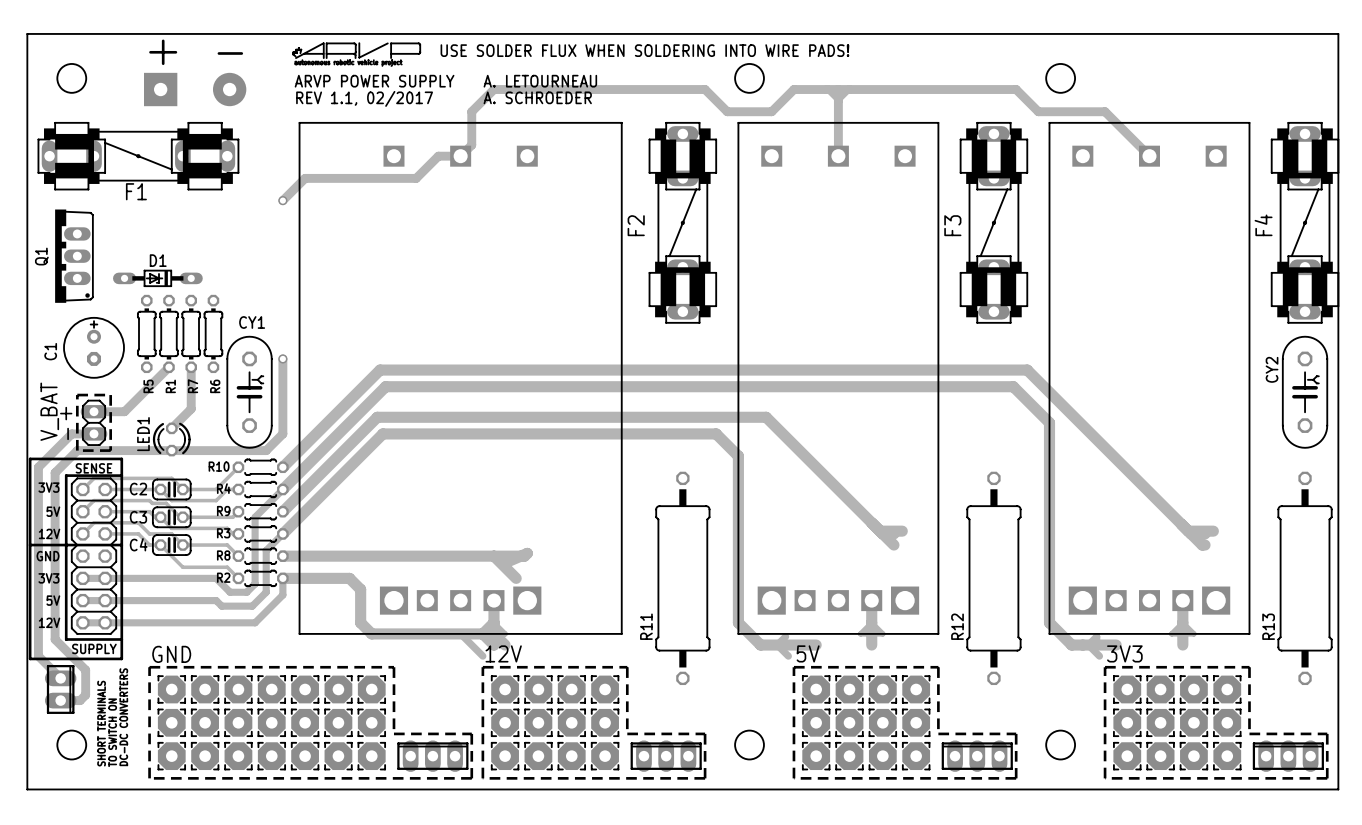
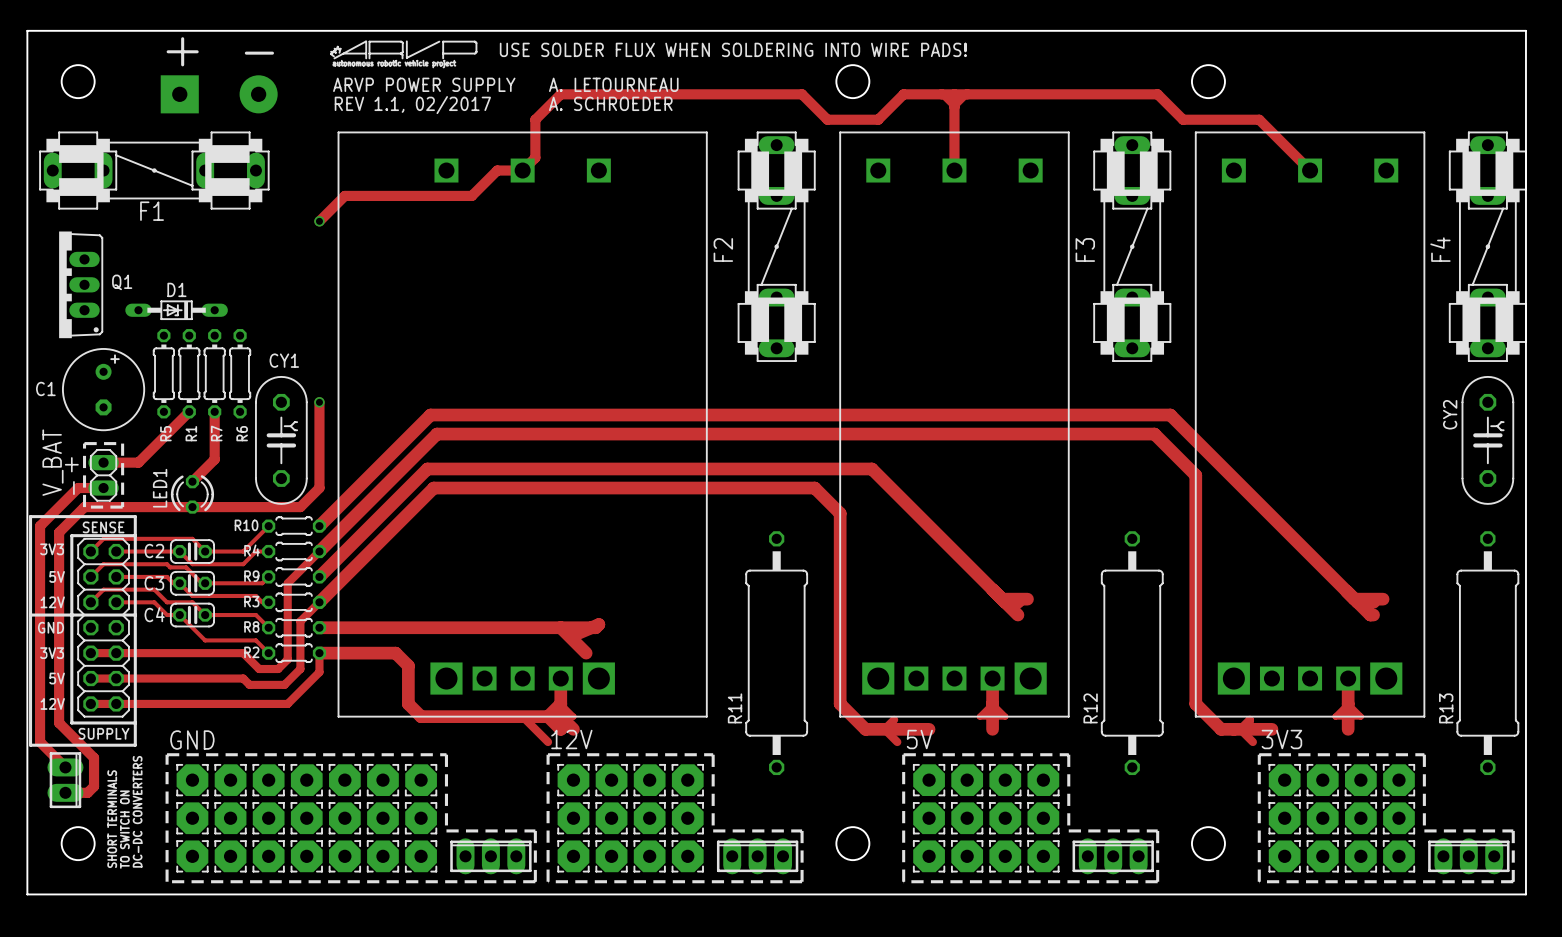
Q1 name rotation: 0° (41, 256) -> 90° clockwise (122, 282)
Q1 name position: Q1 (41, 256) -> Q1 (122, 282)
C1 footprint: [63, 317, 125, 379] -> [62, 348, 145, 432]

